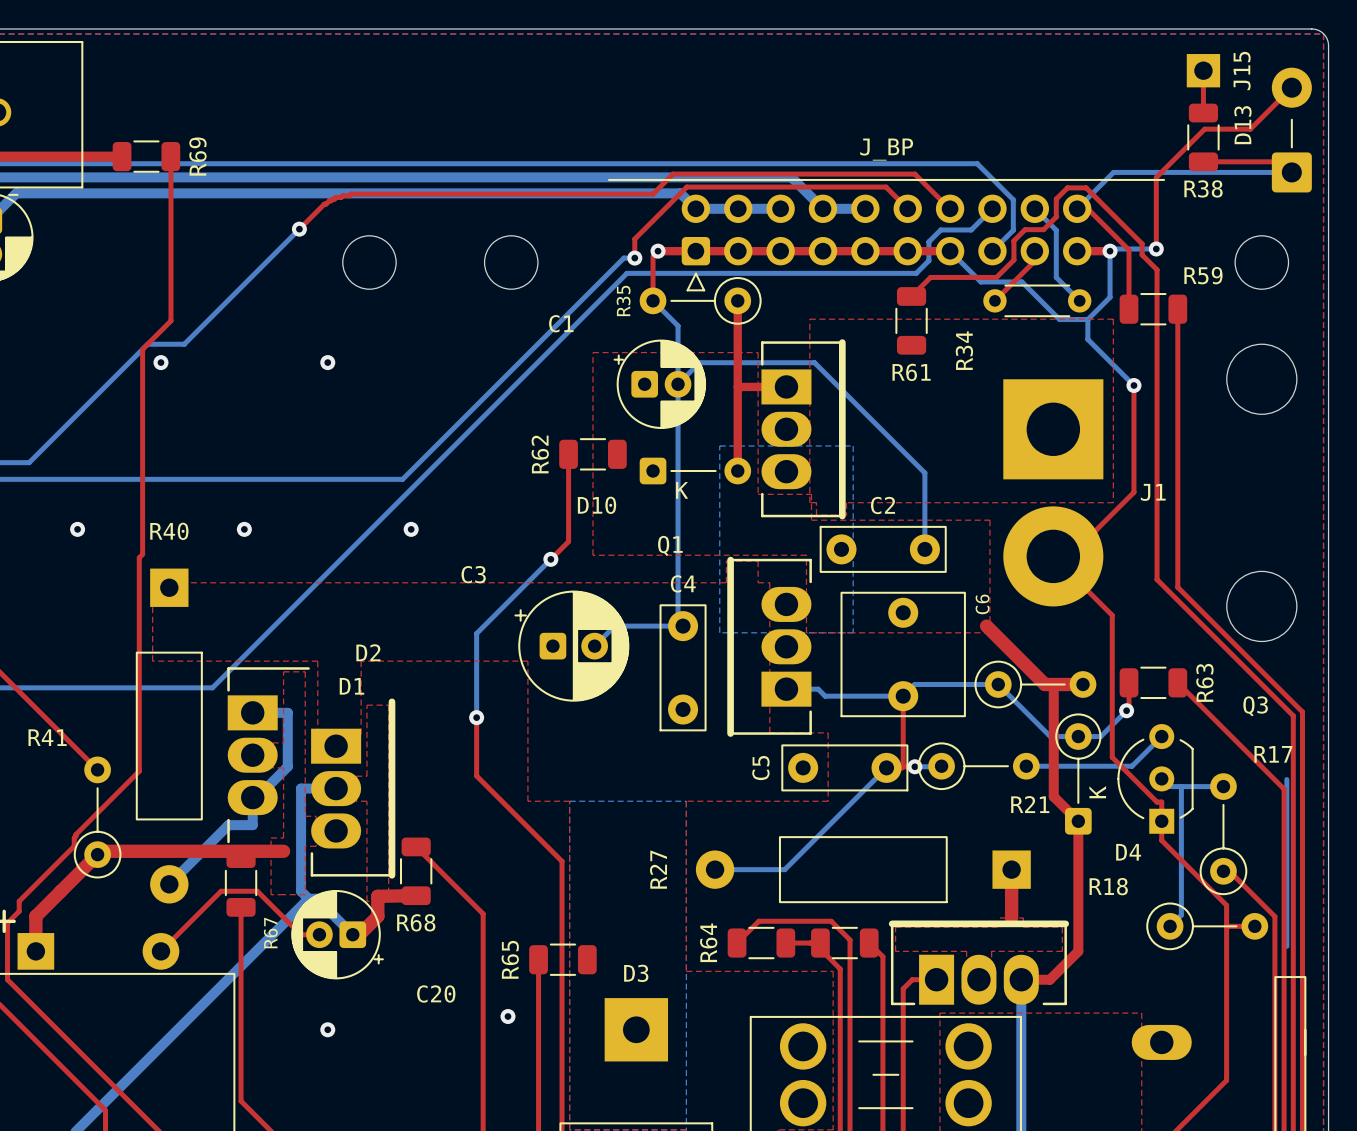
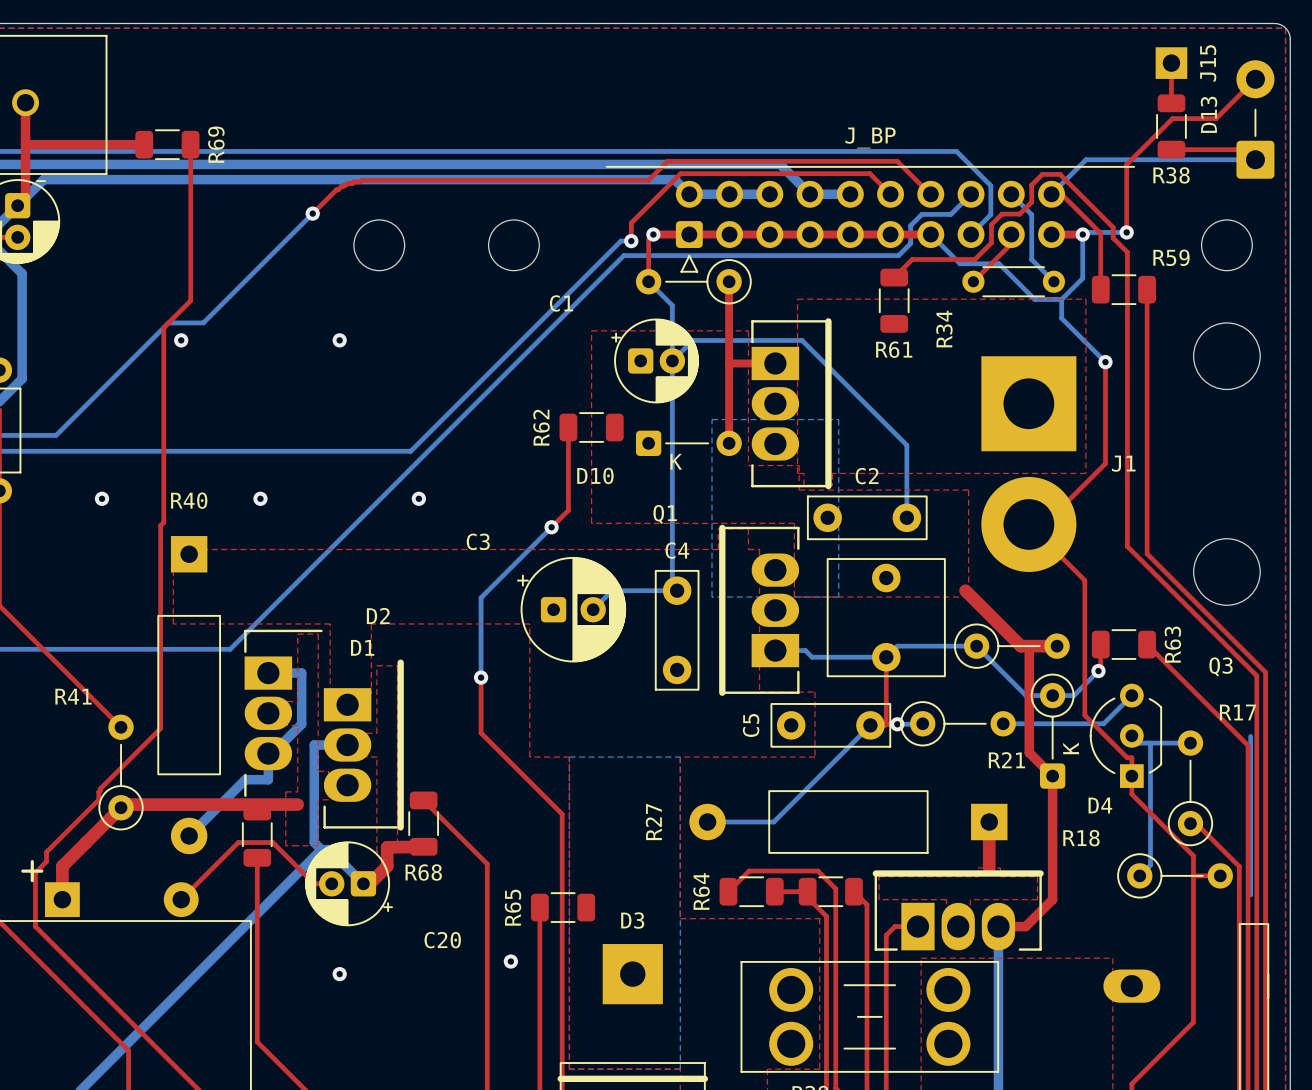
R35 name: R35 (623, 300) -> none
C6 name: C6 (982, 604) -> none
R67 name: R67 (270, 933) -> none

